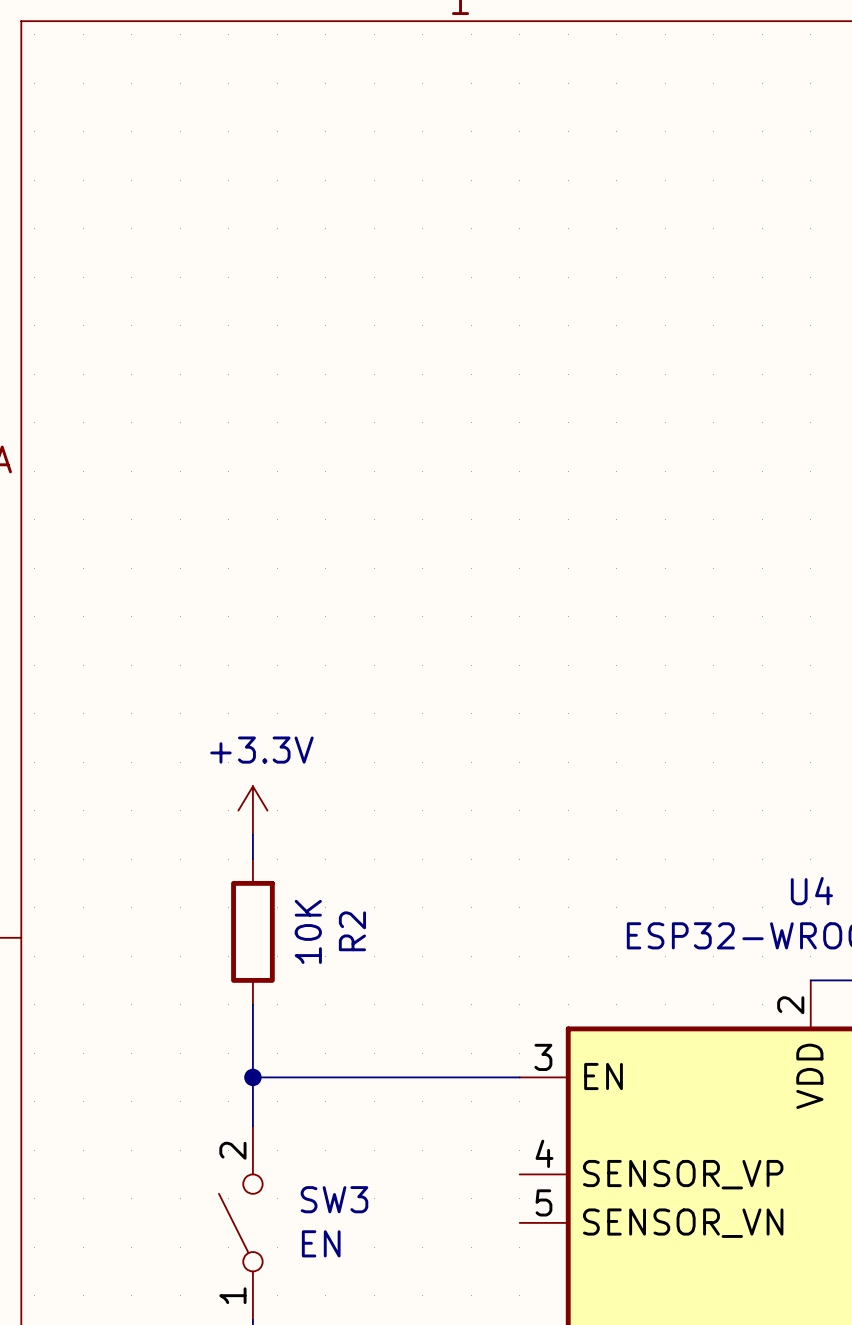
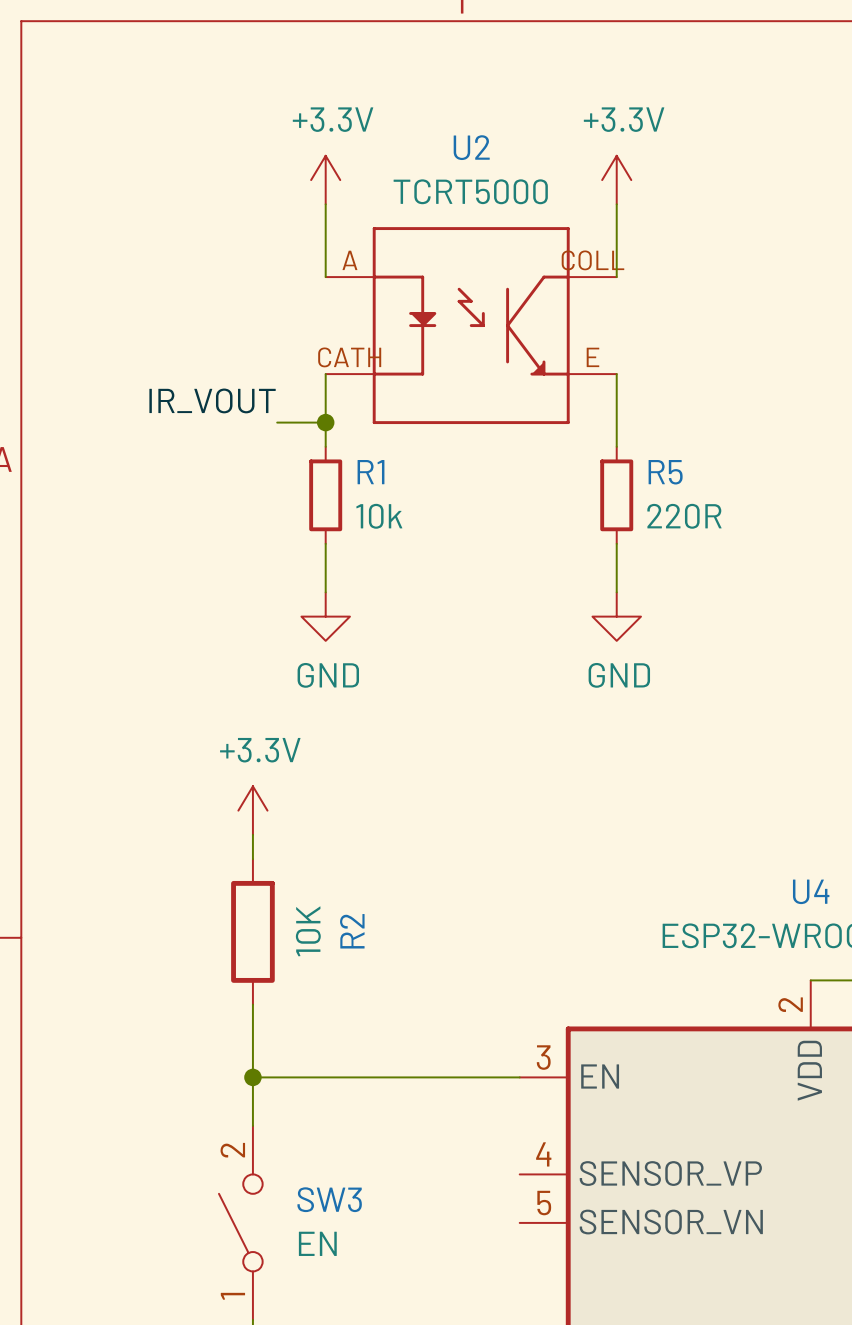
power symbol: none -> +3.3V (325, 180)
power symbol: none -> +3.3V (616, 180)
wire: none -> (325, 204) (325, 277)
wire: none -> (616, 204) (616, 277)
U2: none -> TCRT5000 (471, 325)
wire: none -> (325, 374) (325, 446)
wire: none -> (616, 374) (616, 446)
label: none -> IR_VOUT (212, 400)
wire: none -> (277, 422) (325, 422)
junction: none -> (325, 422)
R1: none -> 10k (325, 495)
R5: none -> 220R (616, 495)
wire: none -> (325, 543) (325, 592)
wire: none -> (616, 543) (616, 592)
power symbol: none -> GND (325, 616)
power symbol: none -> GND (616, 616)

